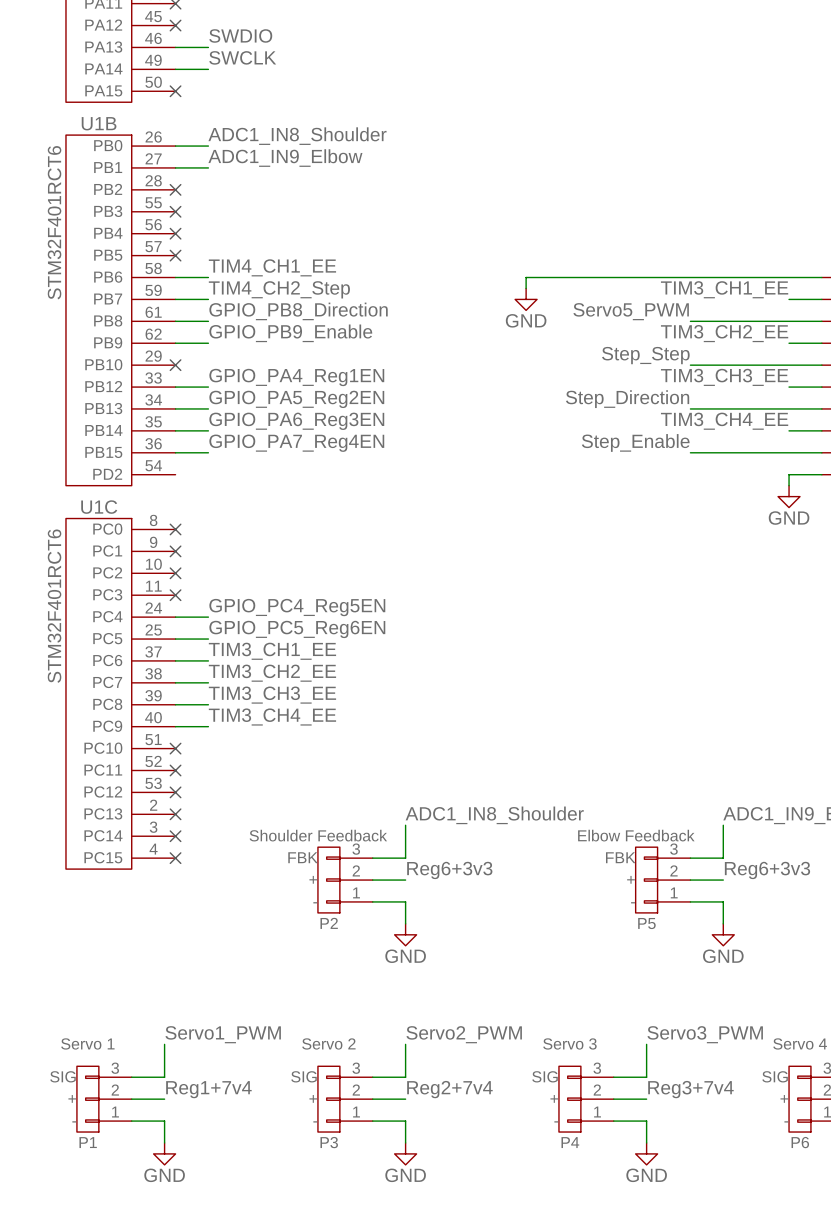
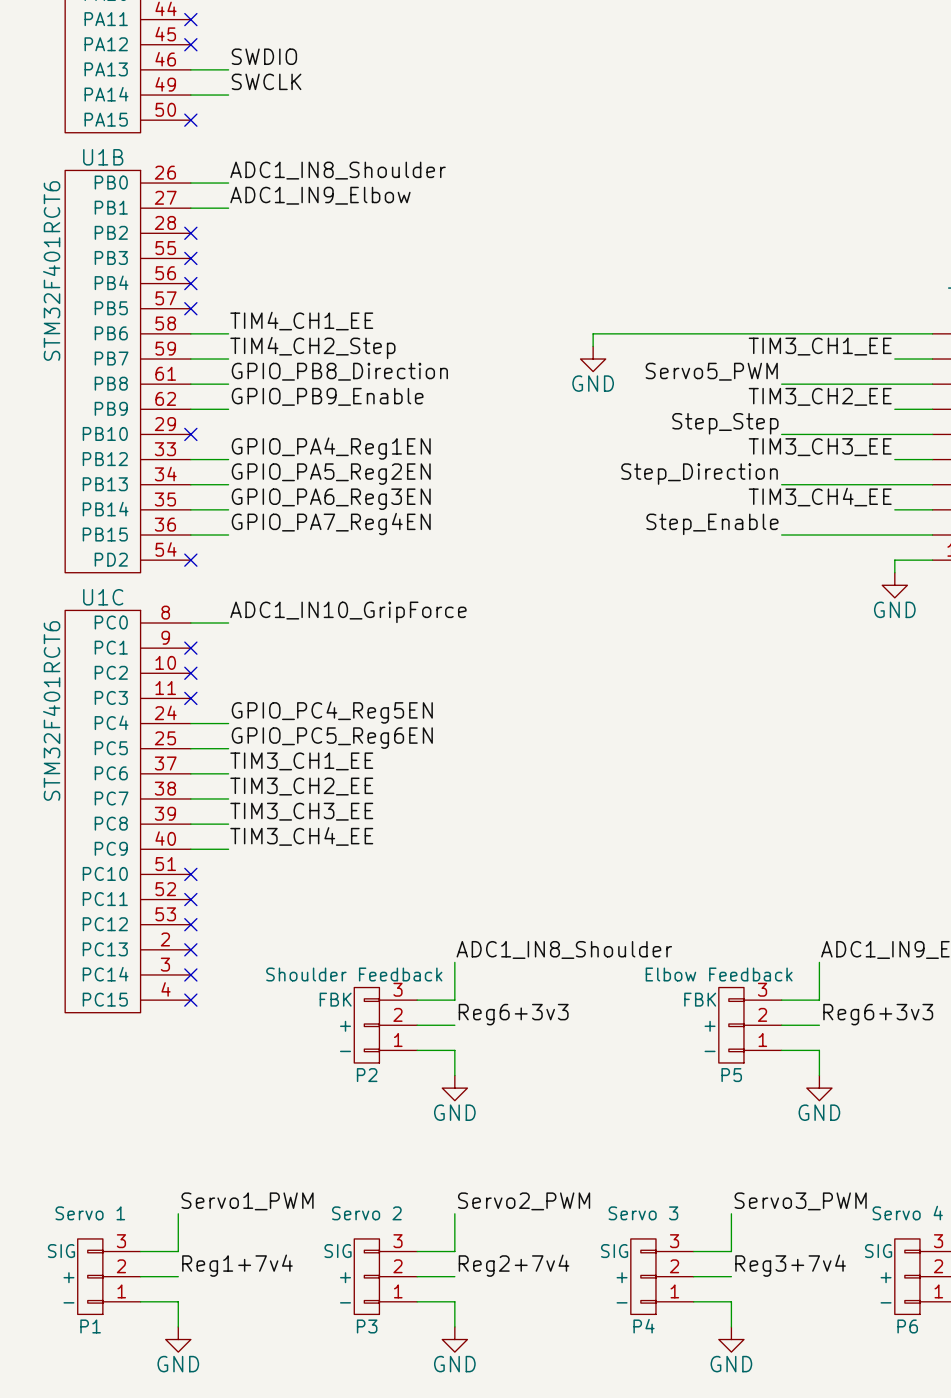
no-connect mark: none -> (190, 560)
label: none -> ADC1_IN10_GripForce (348, 612)
wire: none -> (190, 622) (228, 622)
no-connect mark: (175, 529) -> none

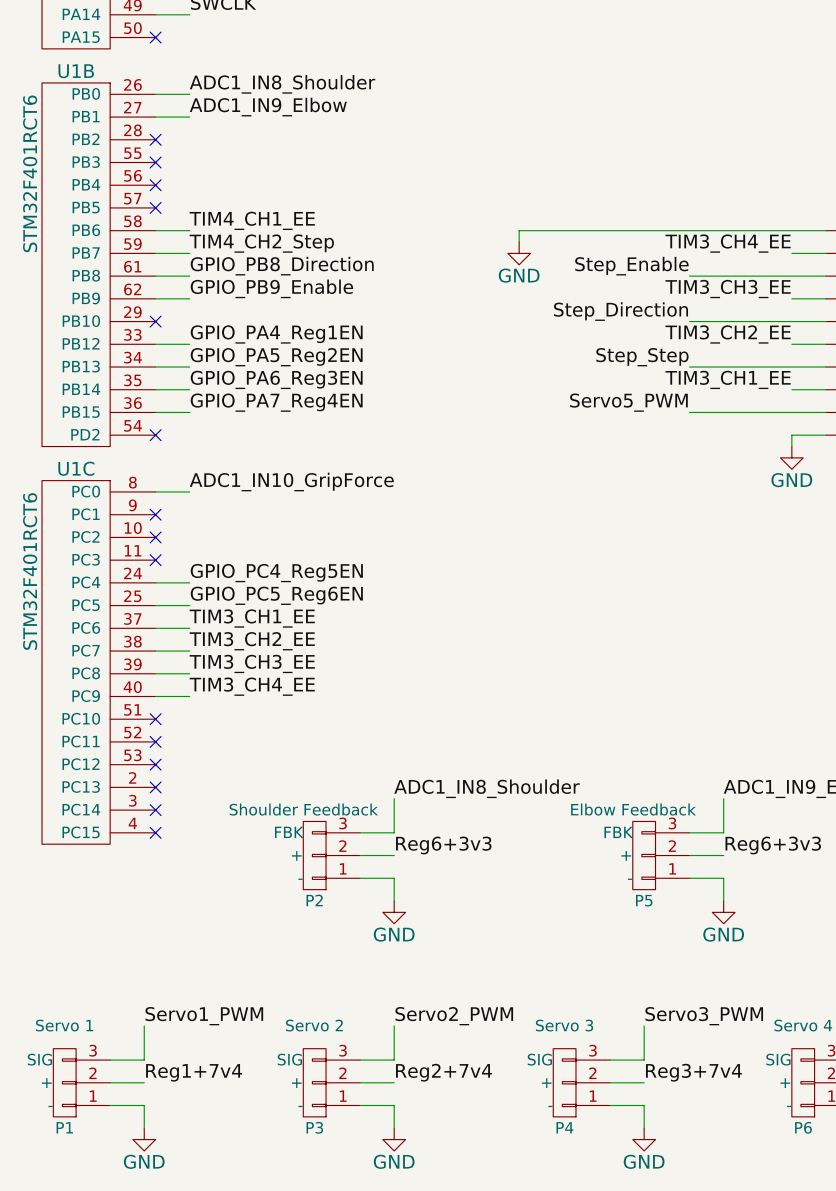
label: TIM3_CH1_EE (820, 346) -> TIM3_CH4_EE (728, 243)
label: Servo5_PWM (711, 371) -> Step_Enable (631, 266)
label: TIM3_CH2_EE (820, 396) -> TIM3_CH3_EE (728, 289)
label: Step_Step (725, 423) -> Step_Direction (621, 311)
label: TIM3_CH3_EE (820, 447) -> TIM3_CH2_EE (728, 334)
label: Step_Direction (699, 474) -> Step_Step (642, 357)
label: TIM3_CH4_EE (820, 497) -> TIM3_CH1_EE (728, 379)
label: Step_Enable (712, 524) -> Servo5_PWM (628, 402)

